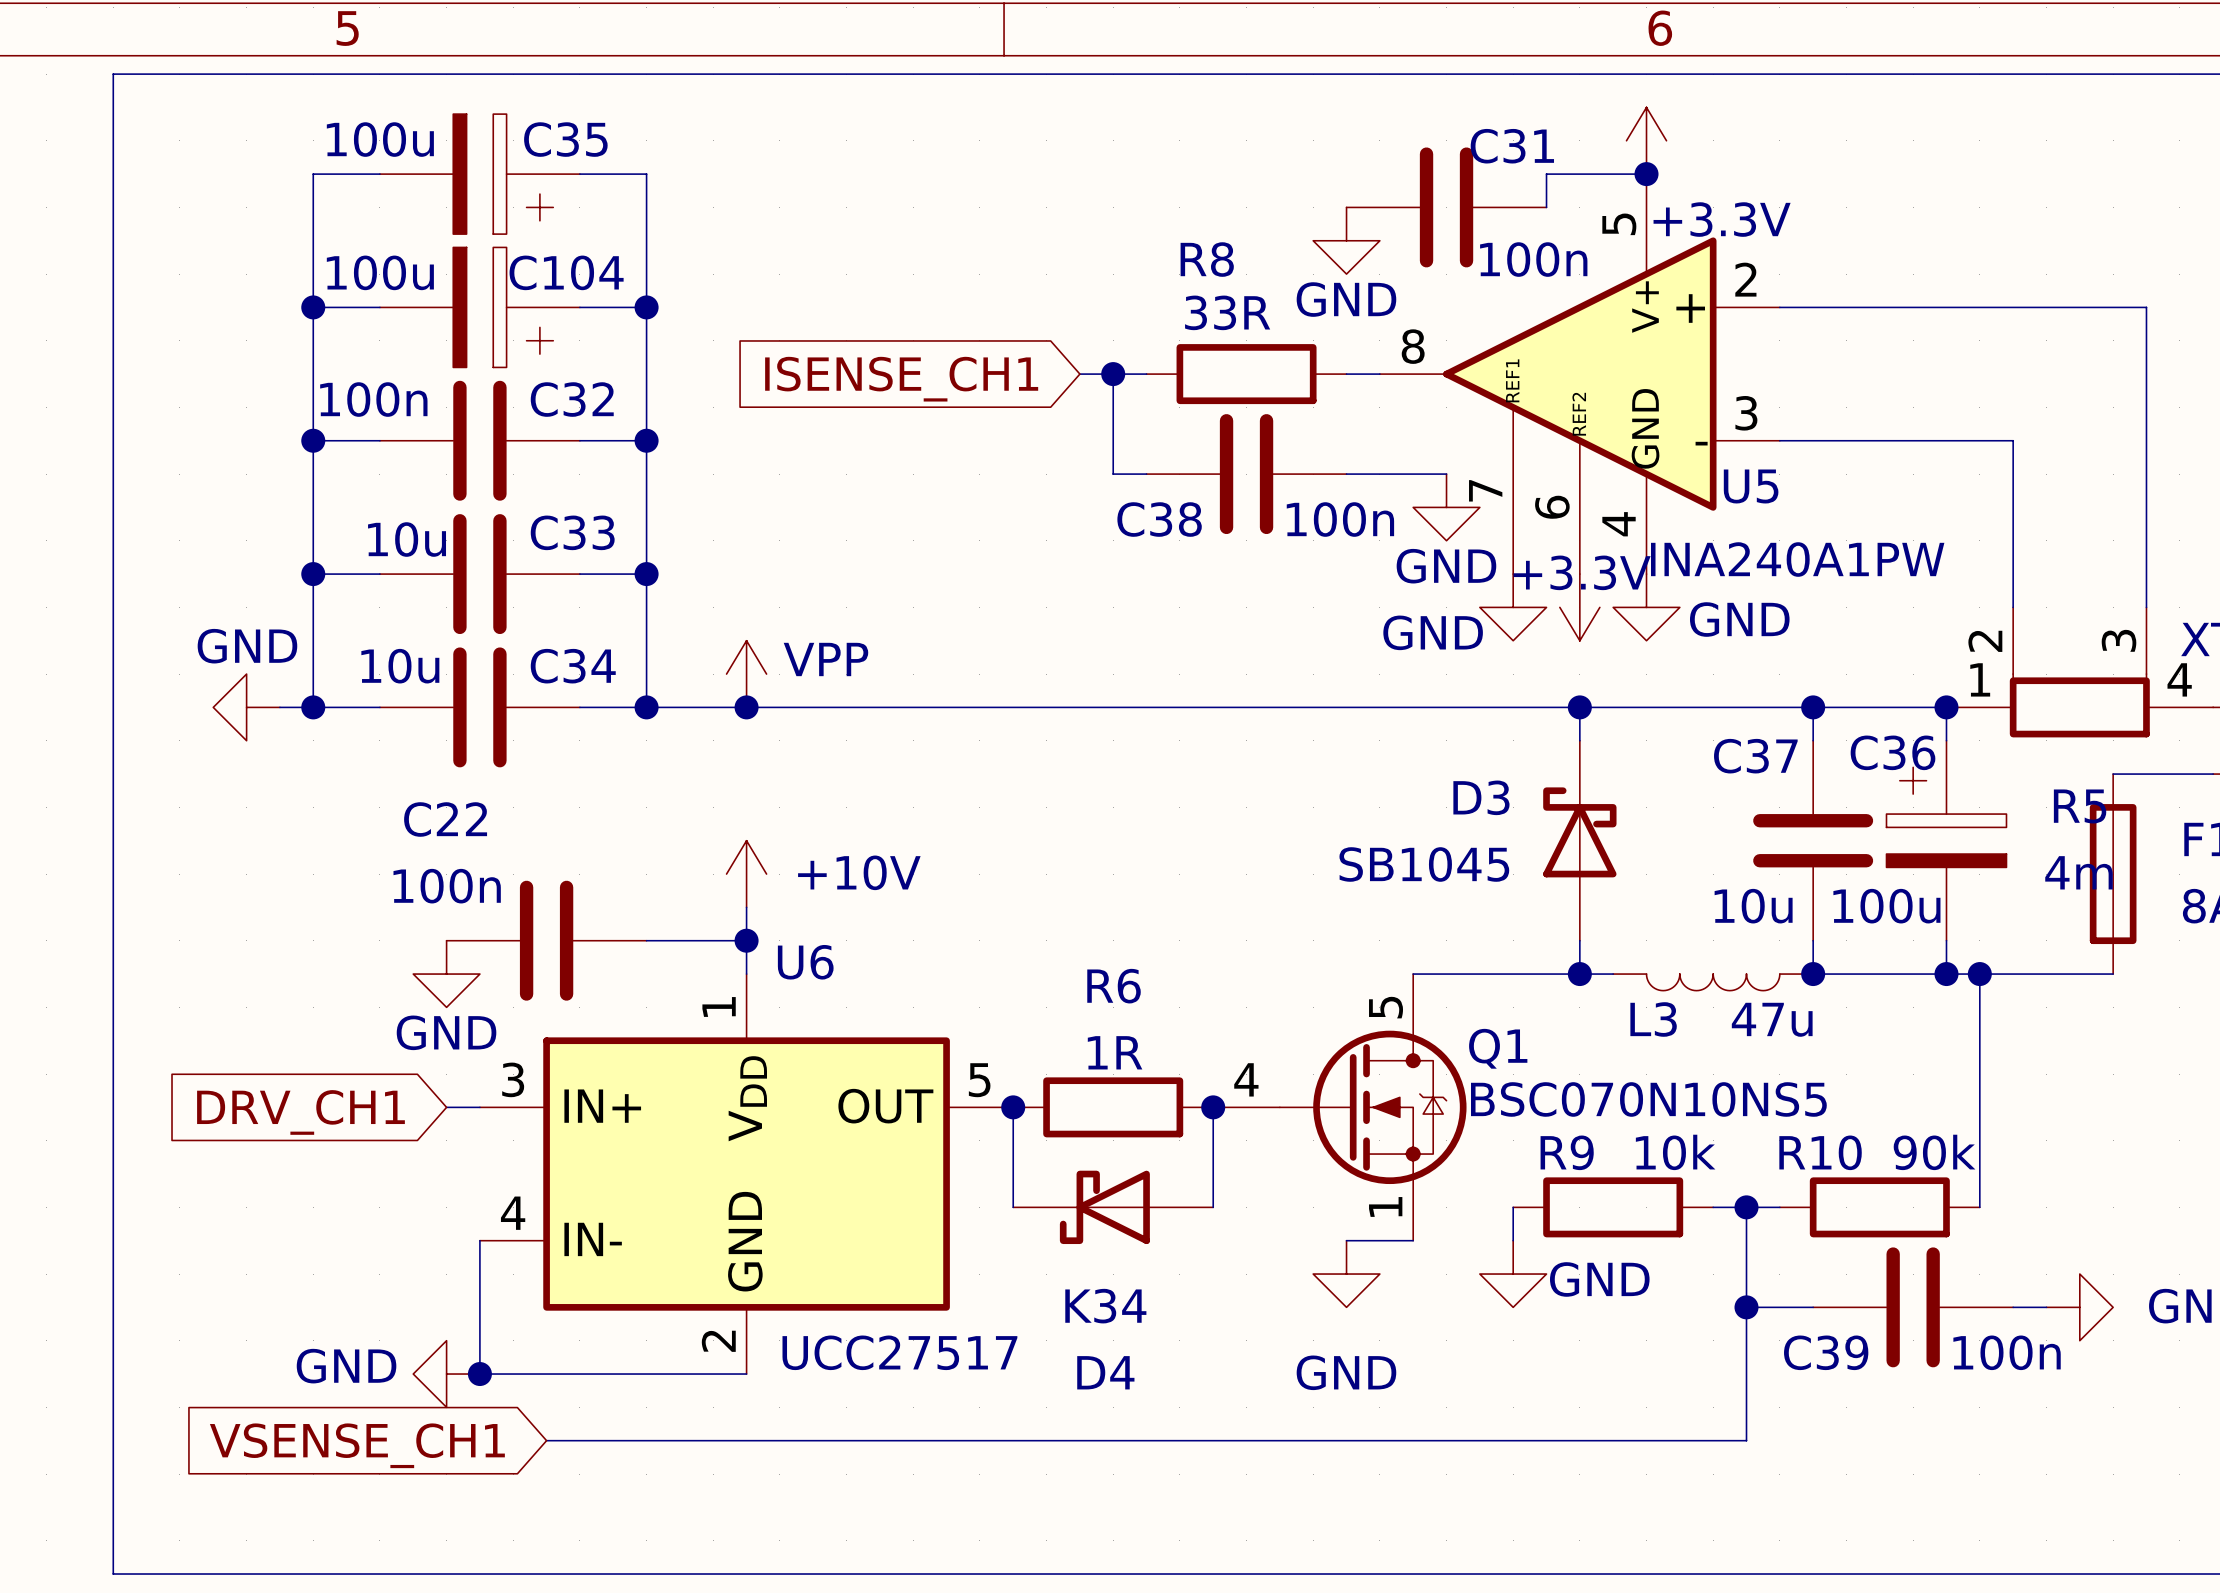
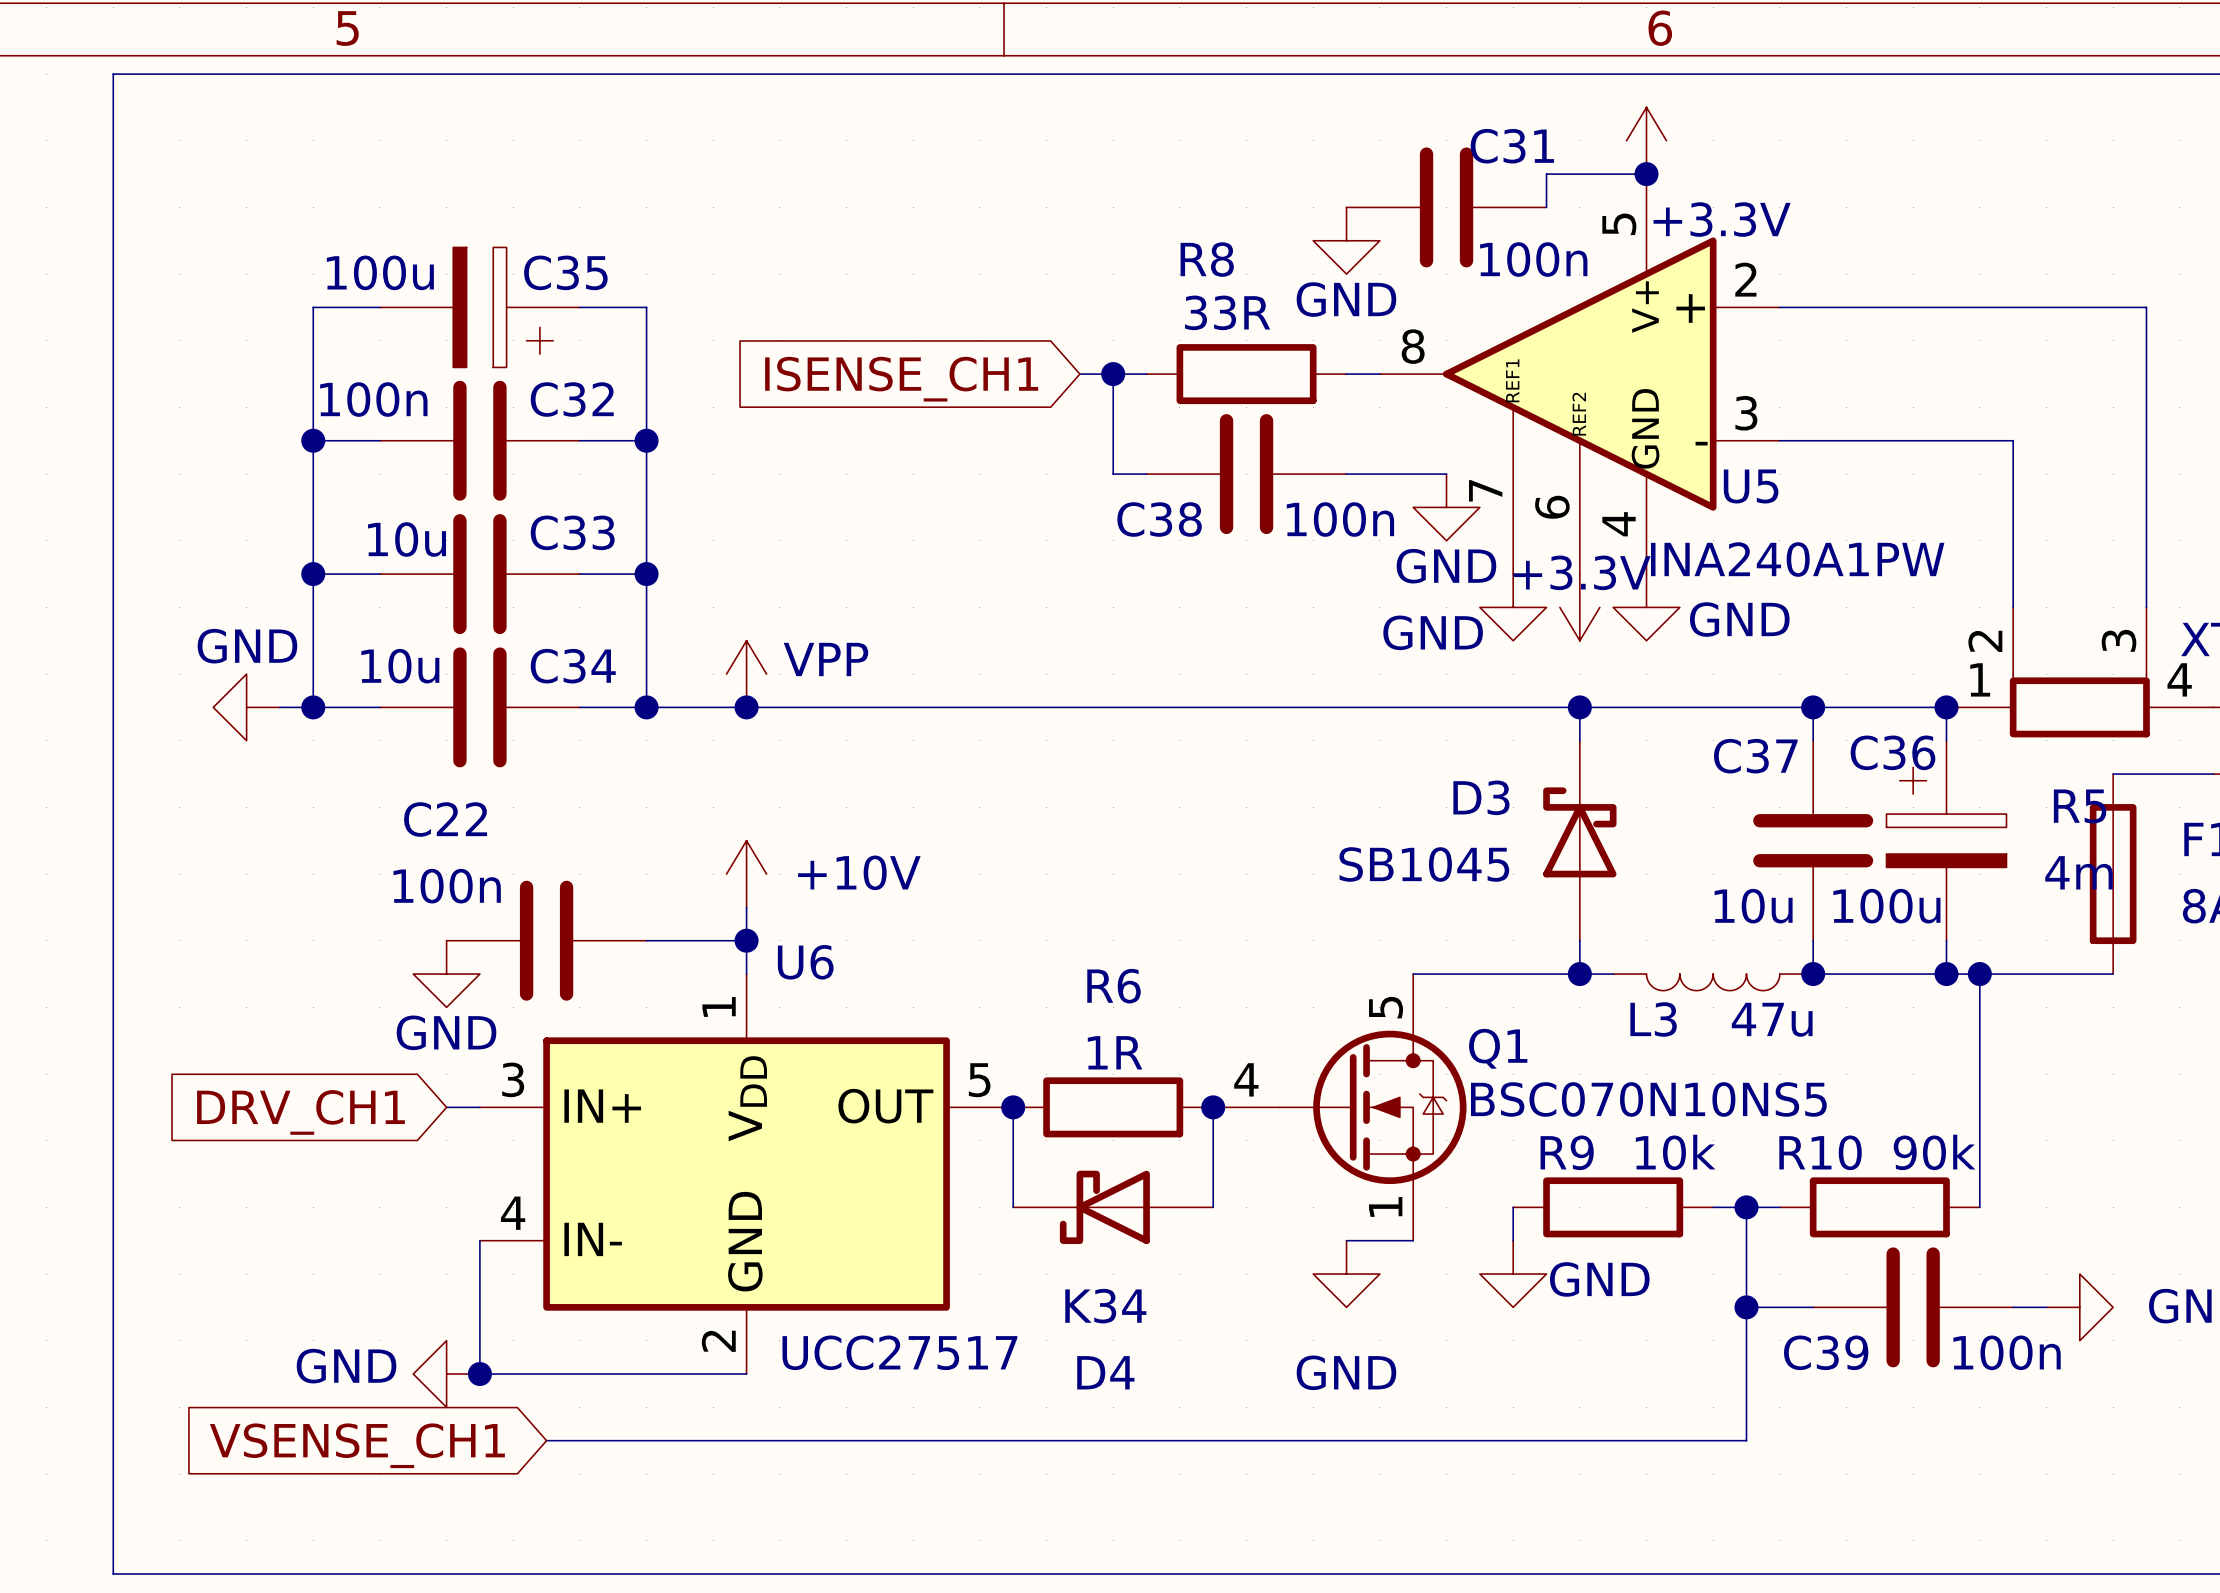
wire: (379, 174) (313, 174) (313, 307) -> none
C35: 100u (479, 174) -> none
wire: (579, 174) (646, 174) (646, 307) -> none
C104 name: C104 (566, 272) -> C35 (565, 272)
junction: (313, 307) -> none
junction: (646, 307) -> none

